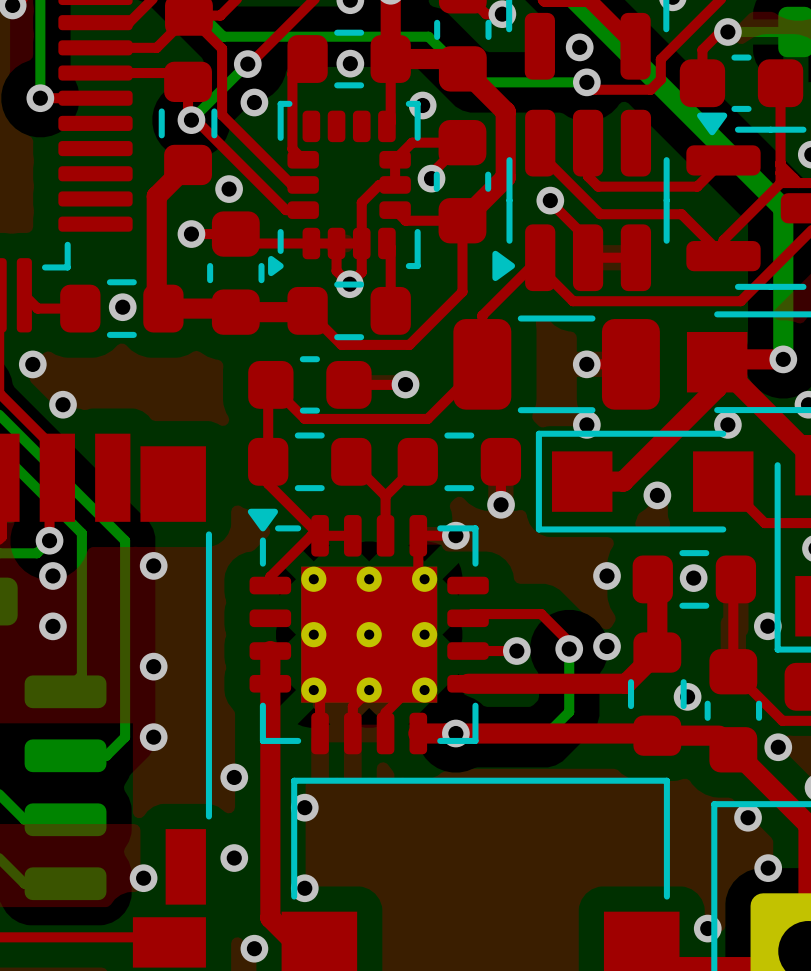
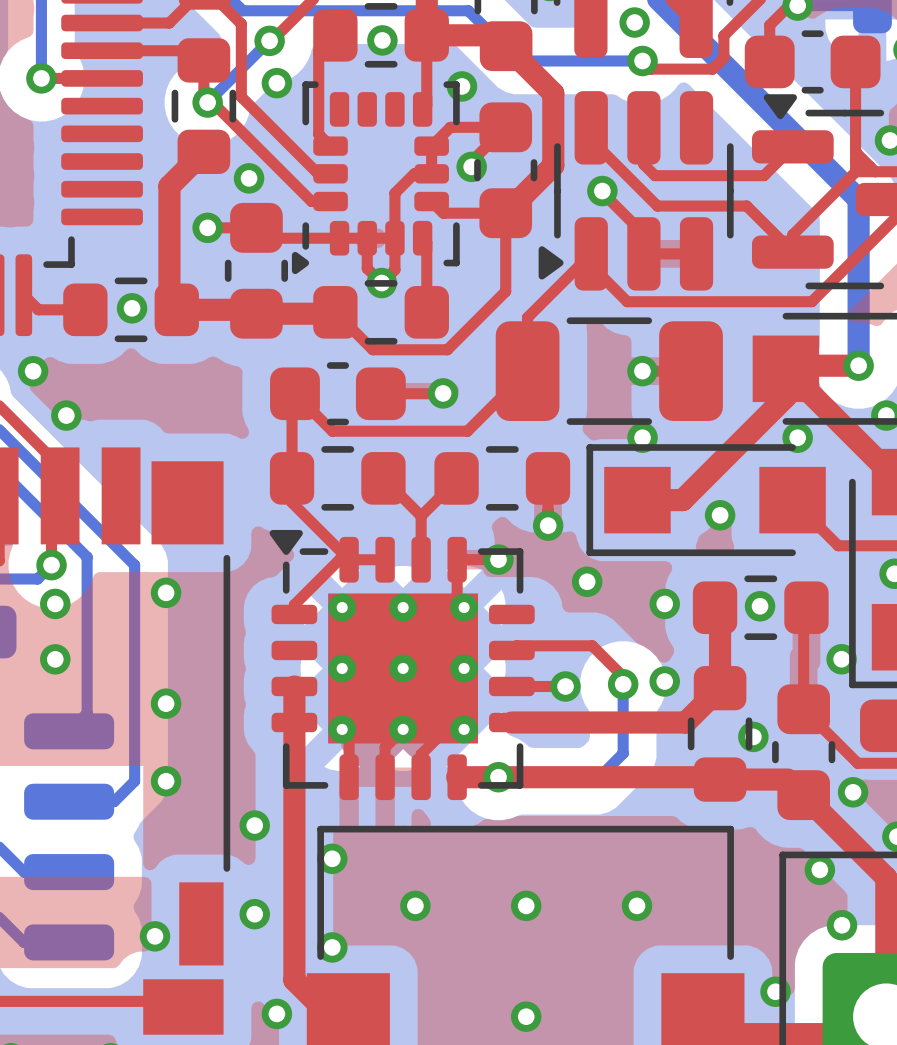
via: none -> (587, 581)
via: none -> (415, 905)
via: none -> (526, 905)
via: none -> (637, 905)
via: none -> (526, 1016)

